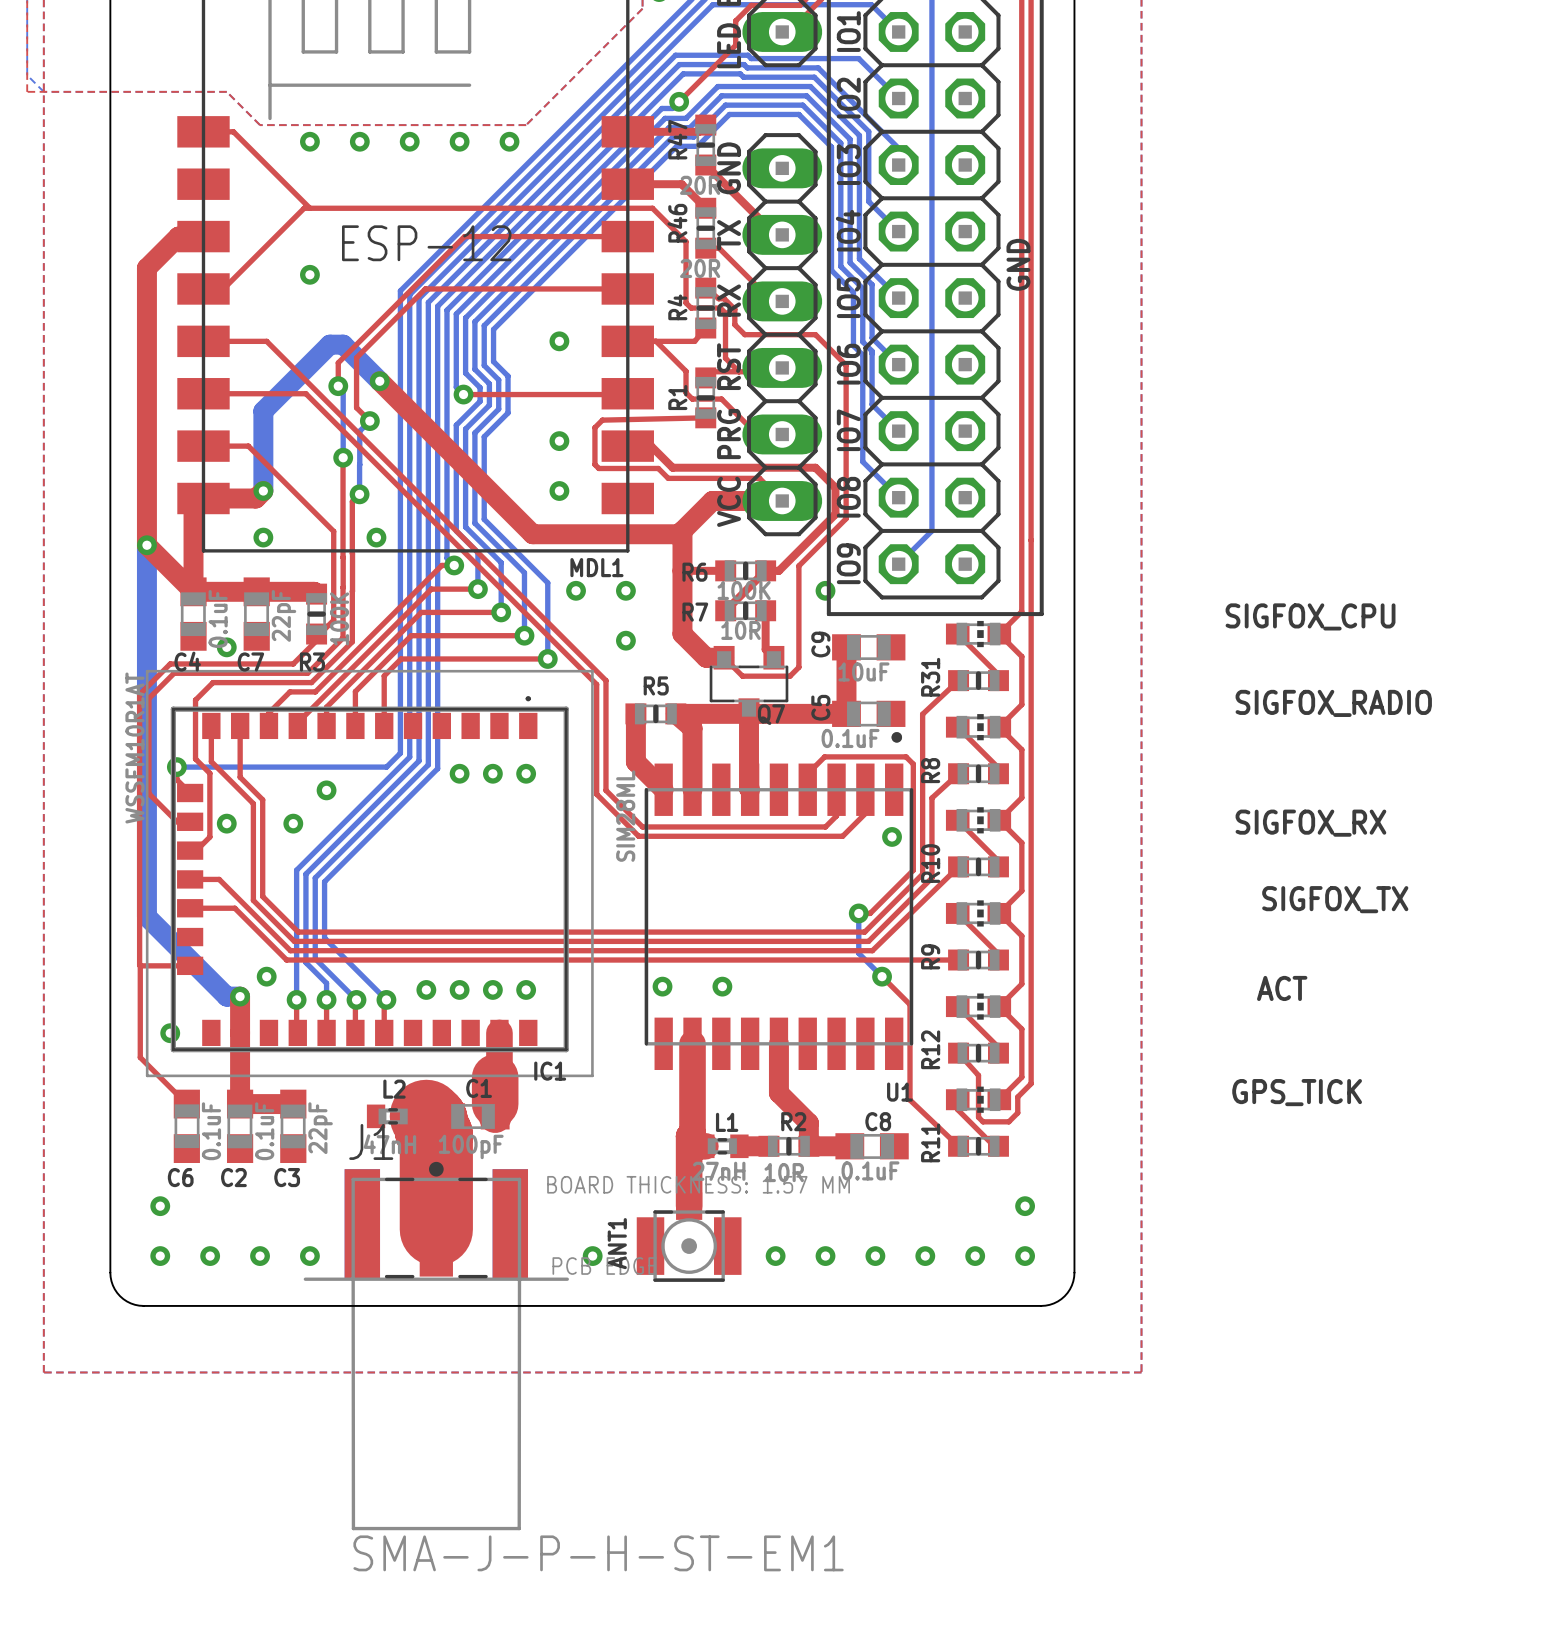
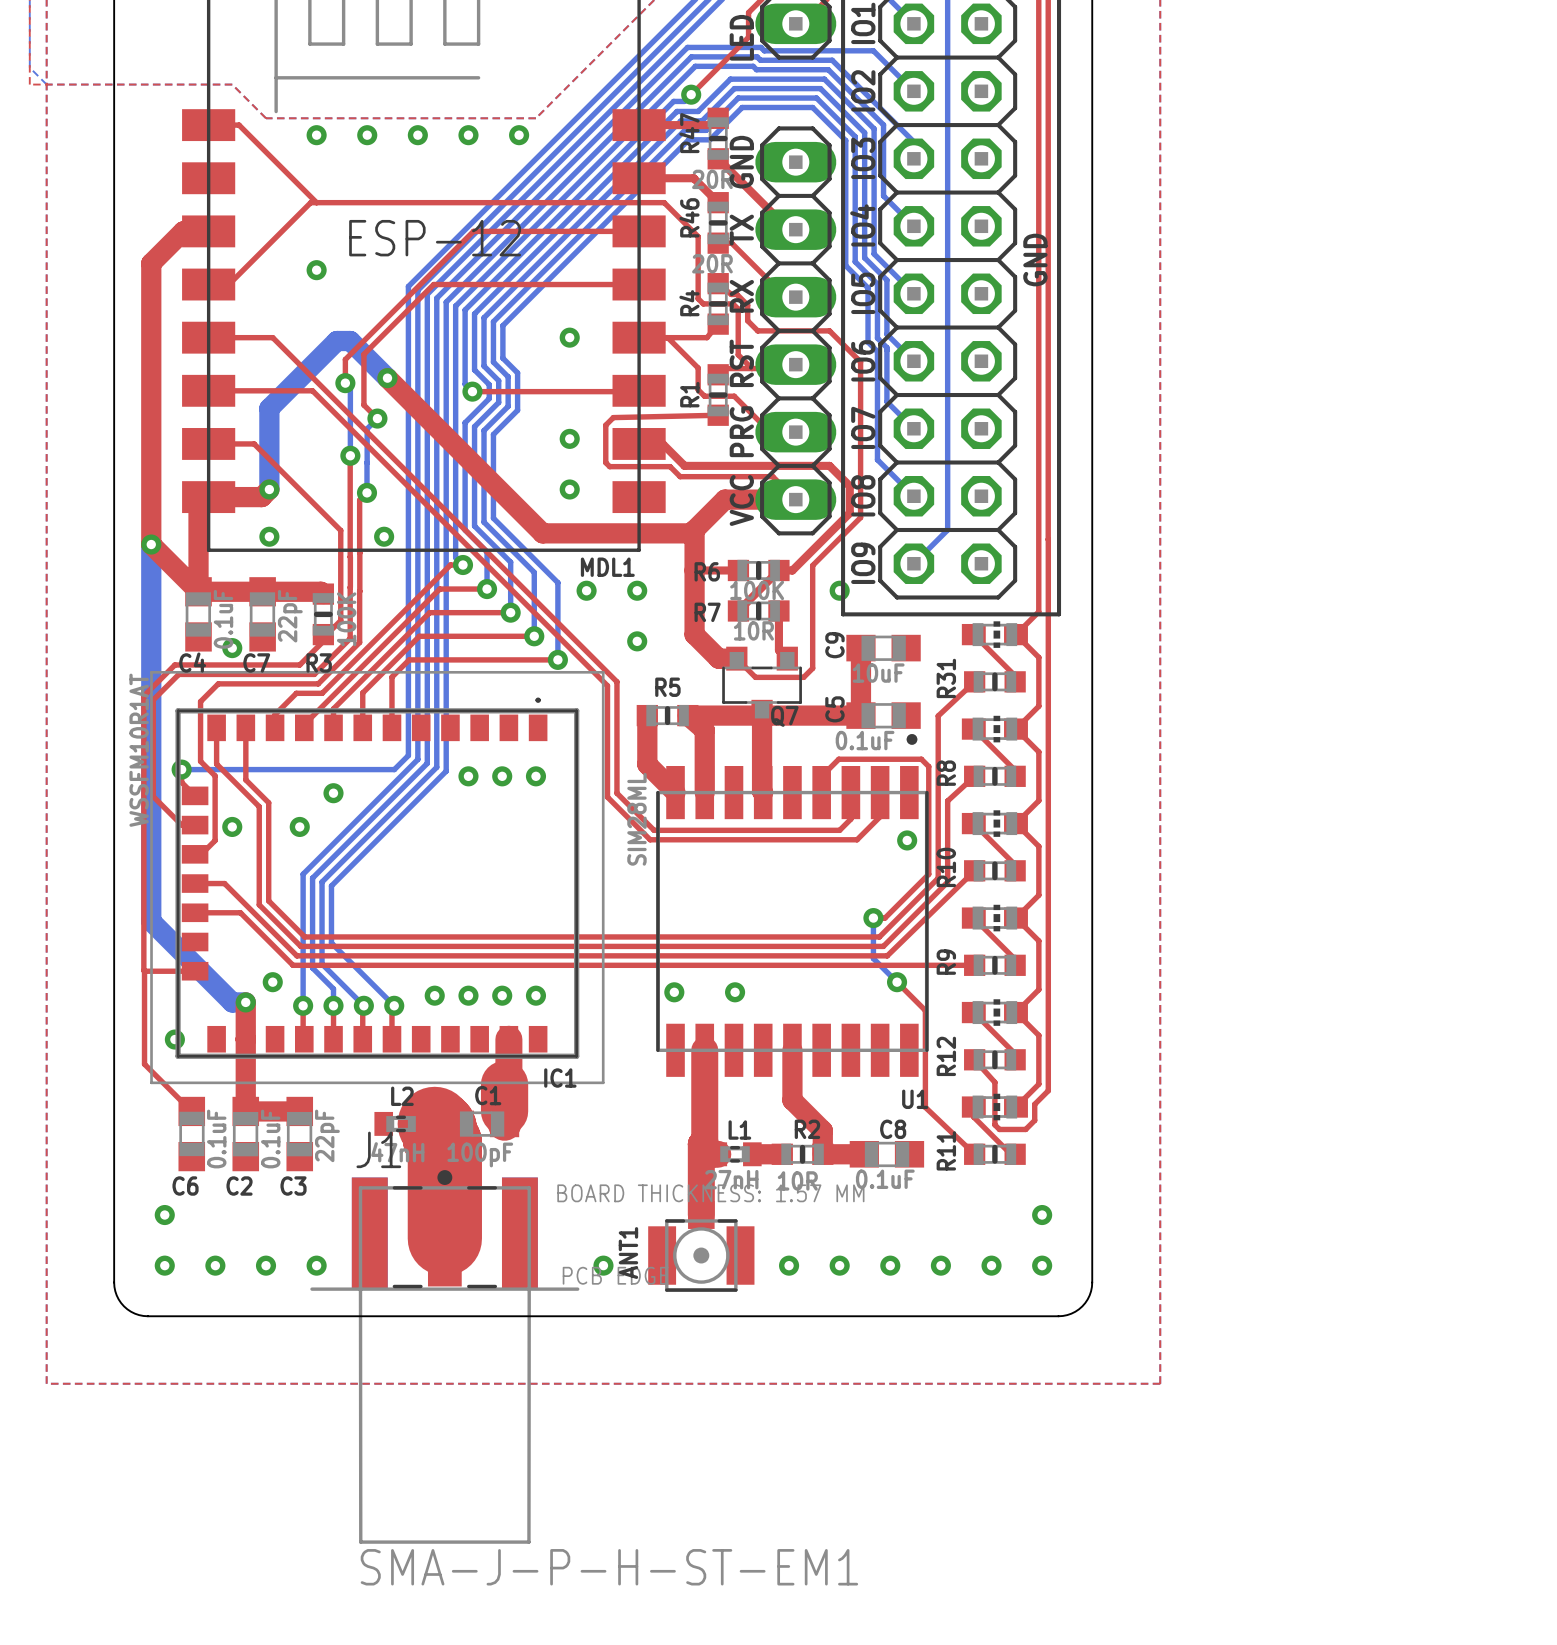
SIGFOX_CPU name: SIGFOX_CPU (1310, 616) -> none
SIGFOX_RADIO name: SIGFOX_RADIO (1333, 703) -> none
SIGFOX_RX name: SIGFOX_RX (1310, 823) -> none
SIGFOX_TX name: SIGFOX_TX (1335, 899) -> none
ACT name: ACT (1282, 988) -> none
GPS_TICK name: GPS_TICK (1297, 1092) -> none

